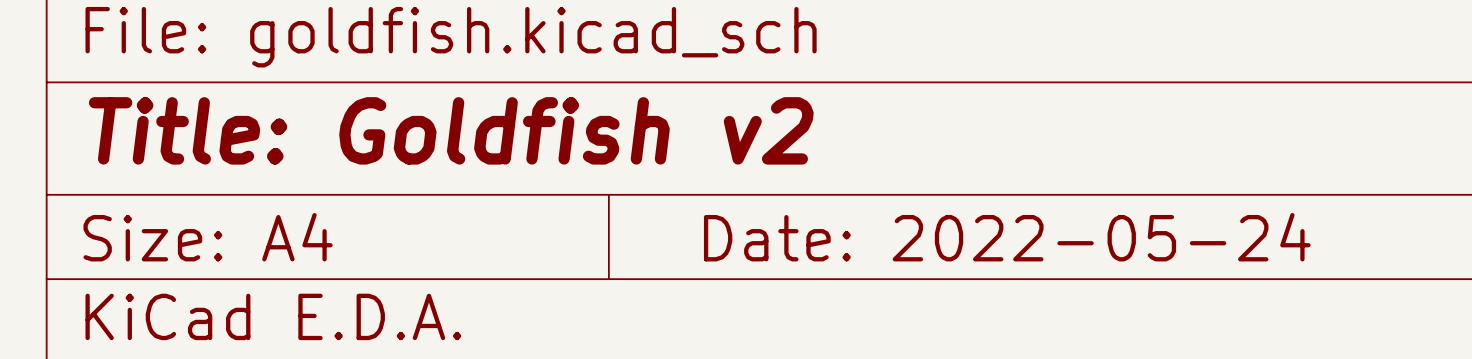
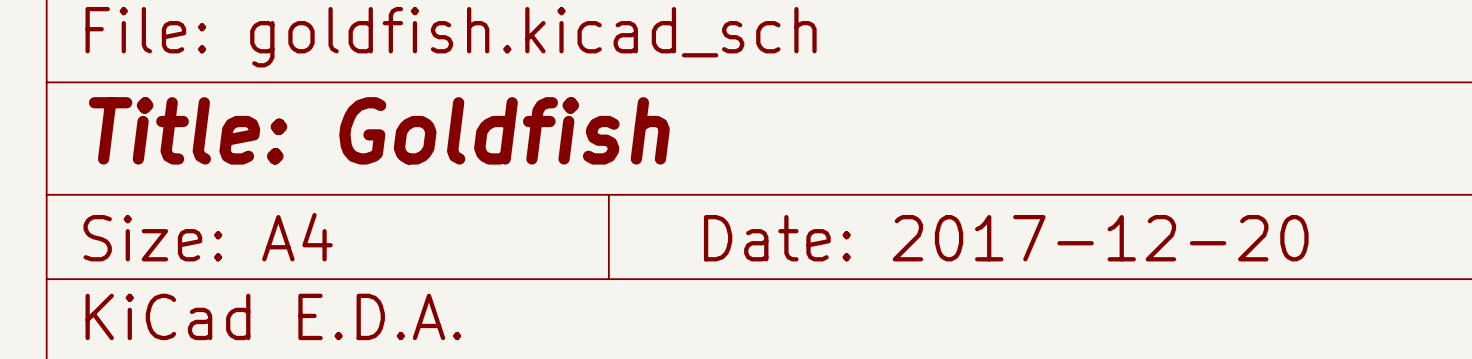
title block: Title: Goldfish v2 (451, 130) -> Title: Goldfish (379, 130)
title block: Date: 2022-05-24 (1007, 237) -> Date: 2017-12-20 (1006, 238)

